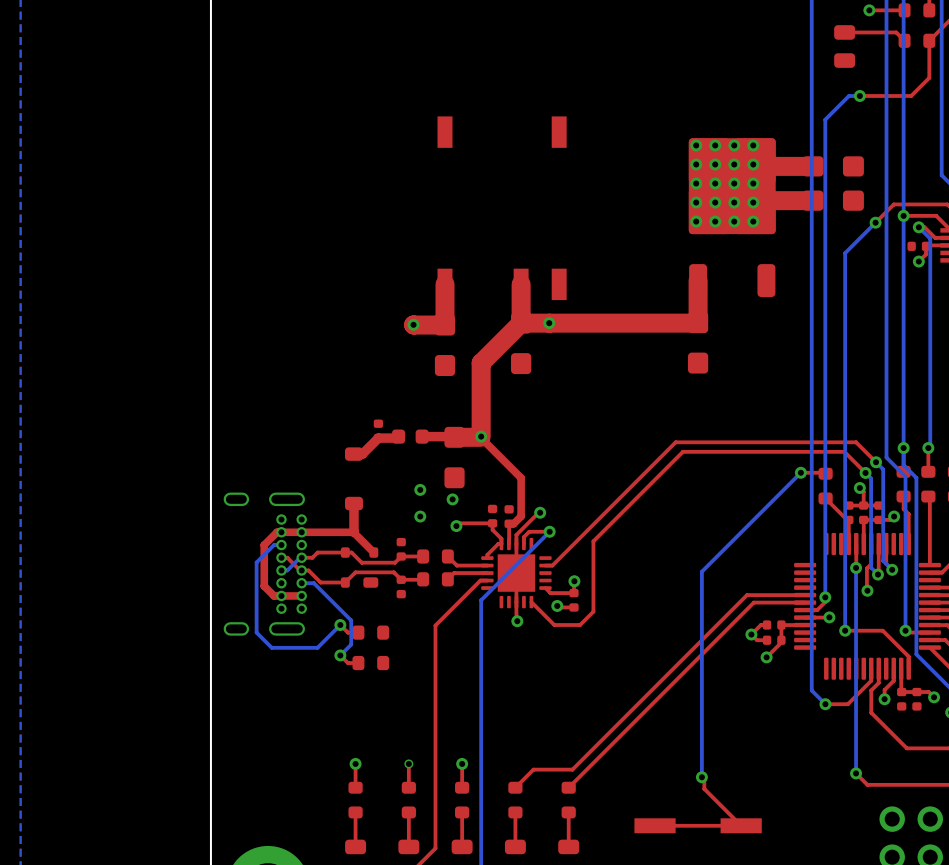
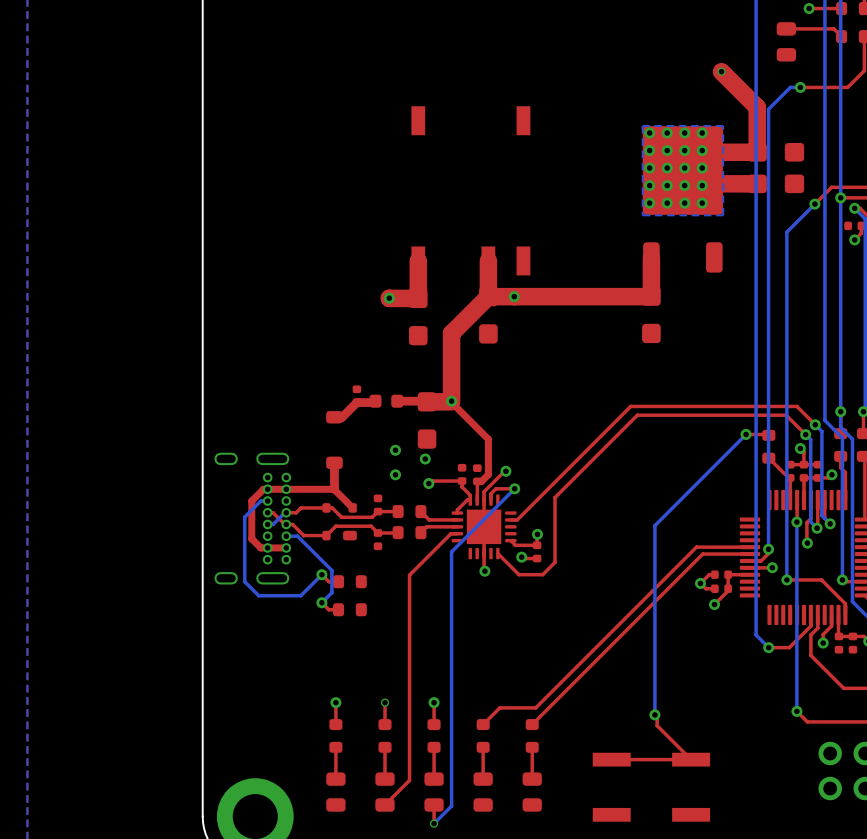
top track: none -> (721, 71) (757, 107) (757, 152)
via: none -> (721, 71)
bottom zone outline: none -> (723, 125) (642, 125) (642, 215) (723, 215) (723, 125)

